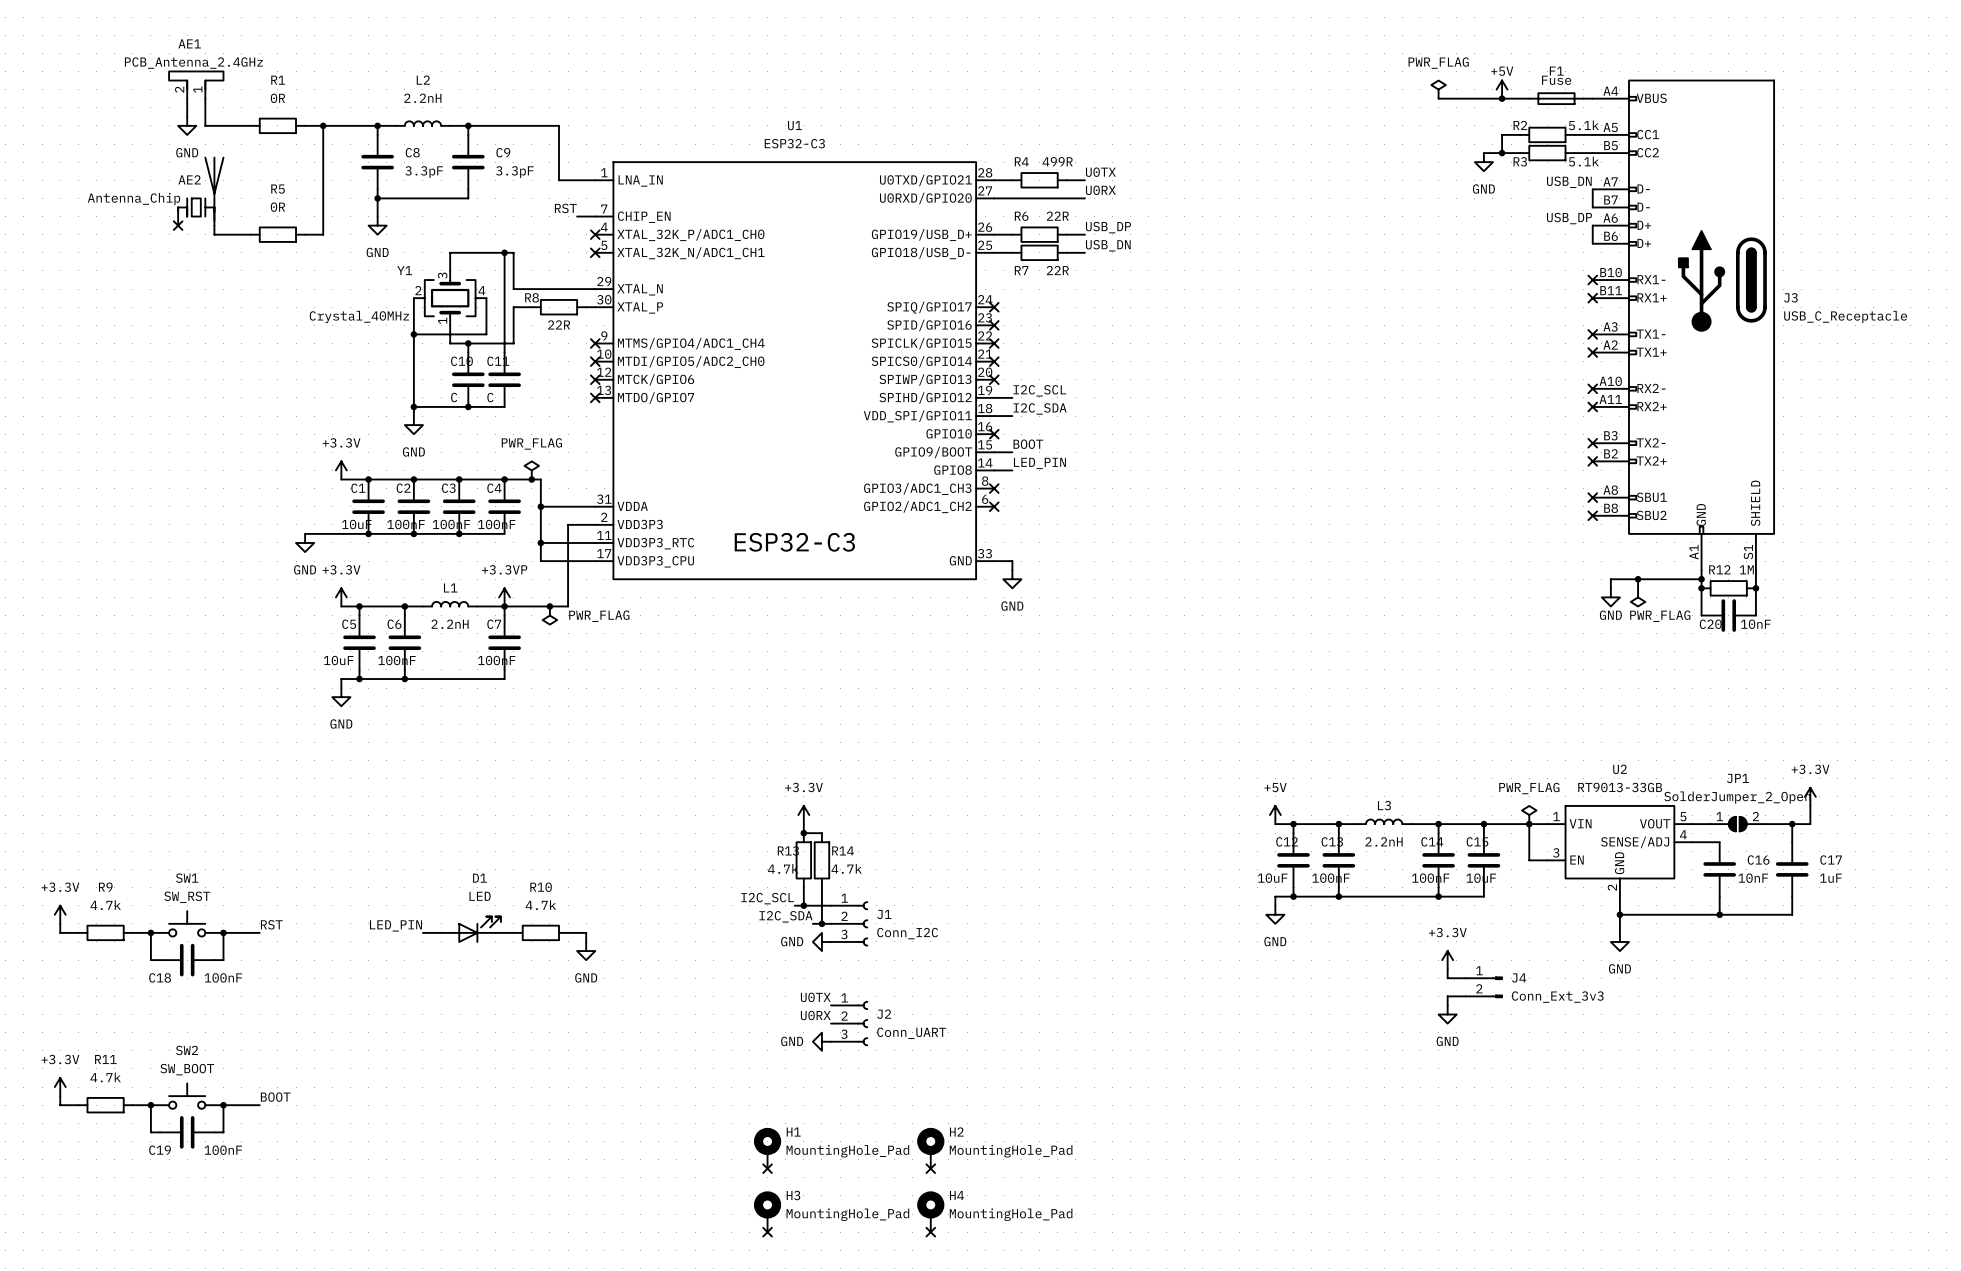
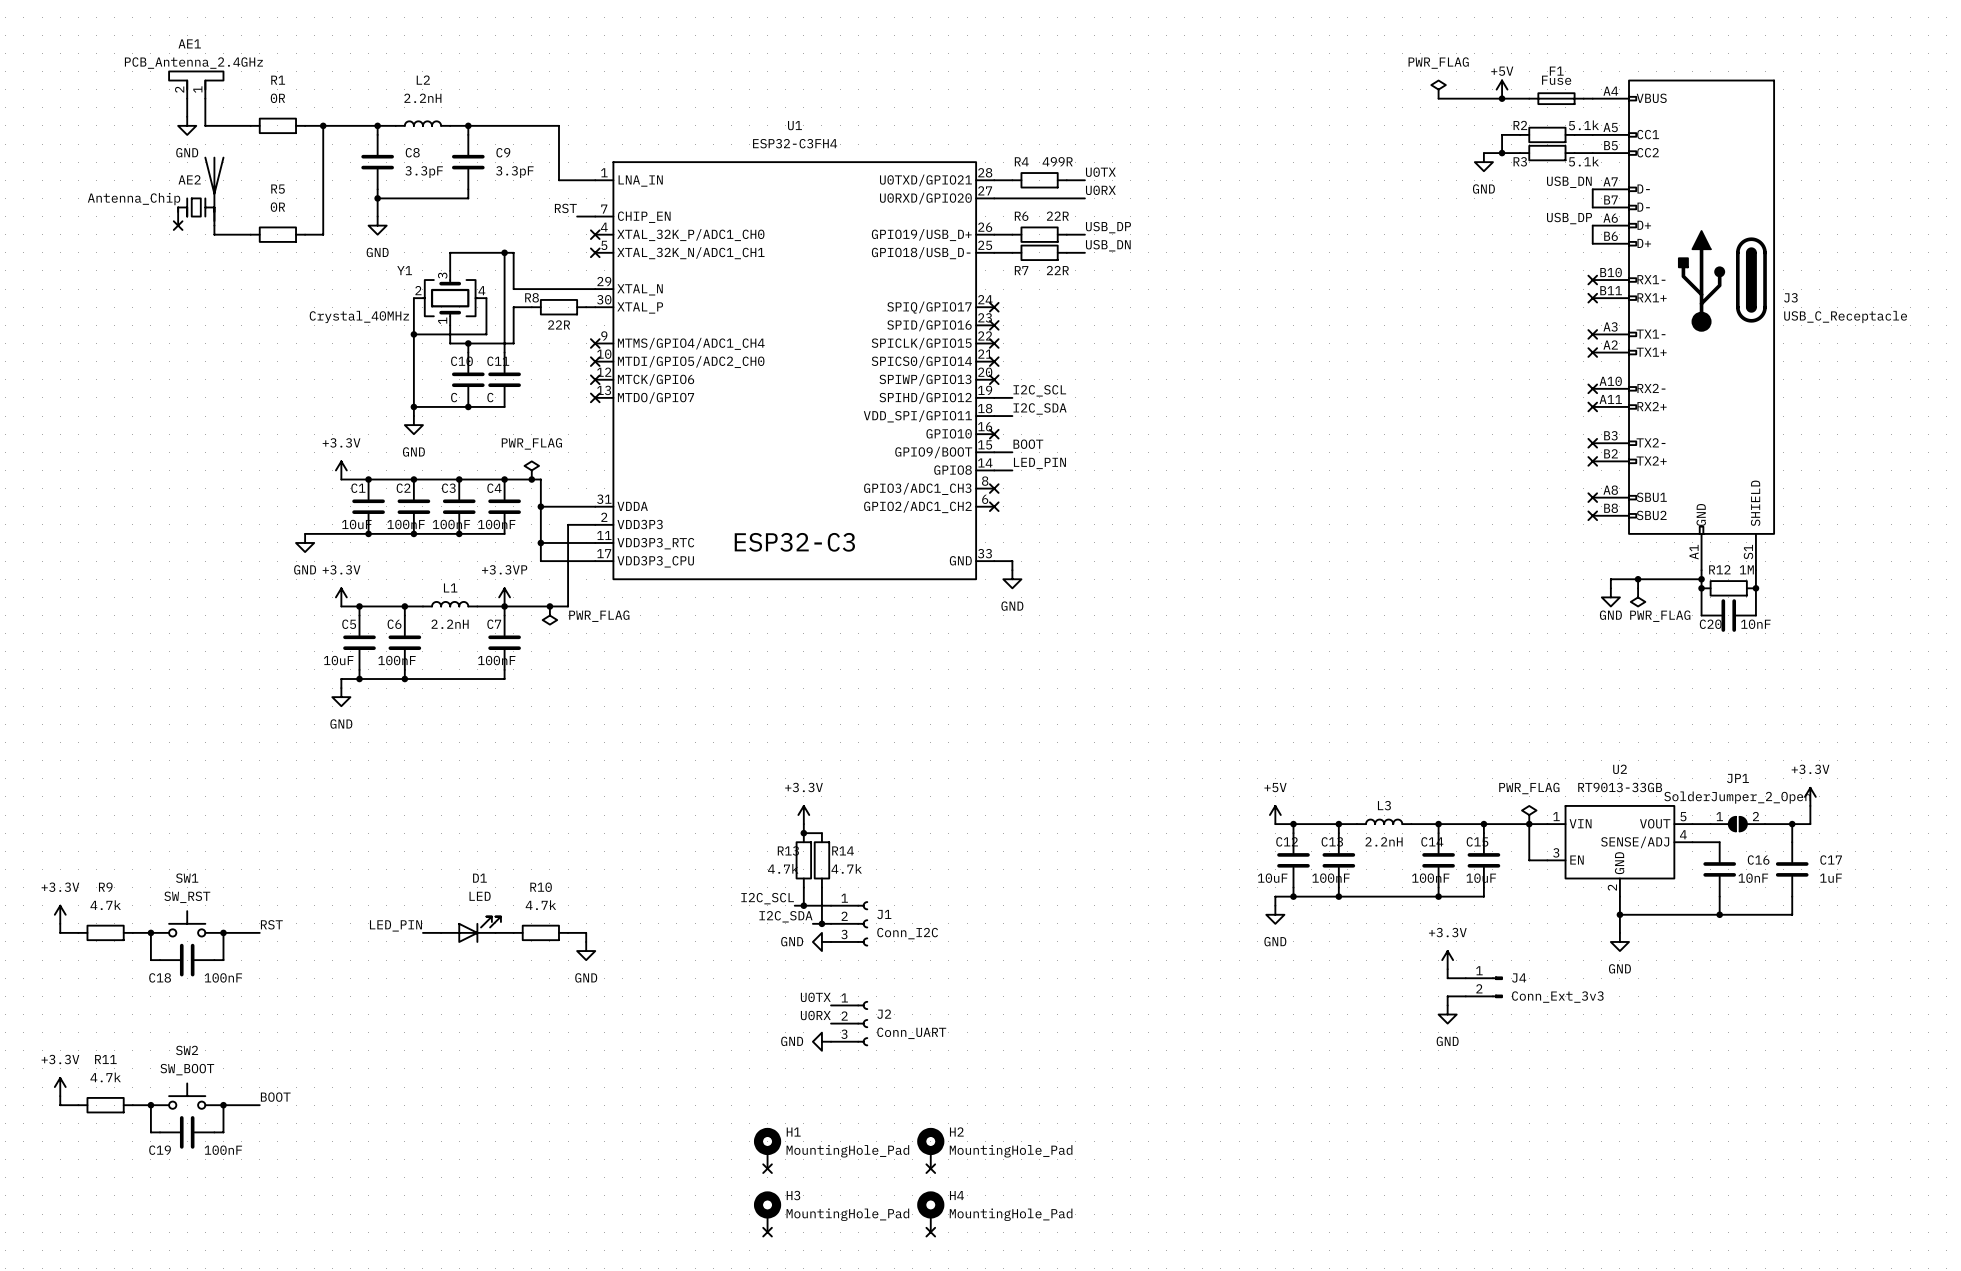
U1 value: ESP32-C3 (794, 143) -> ESP32-C3FH4 (795, 143)

